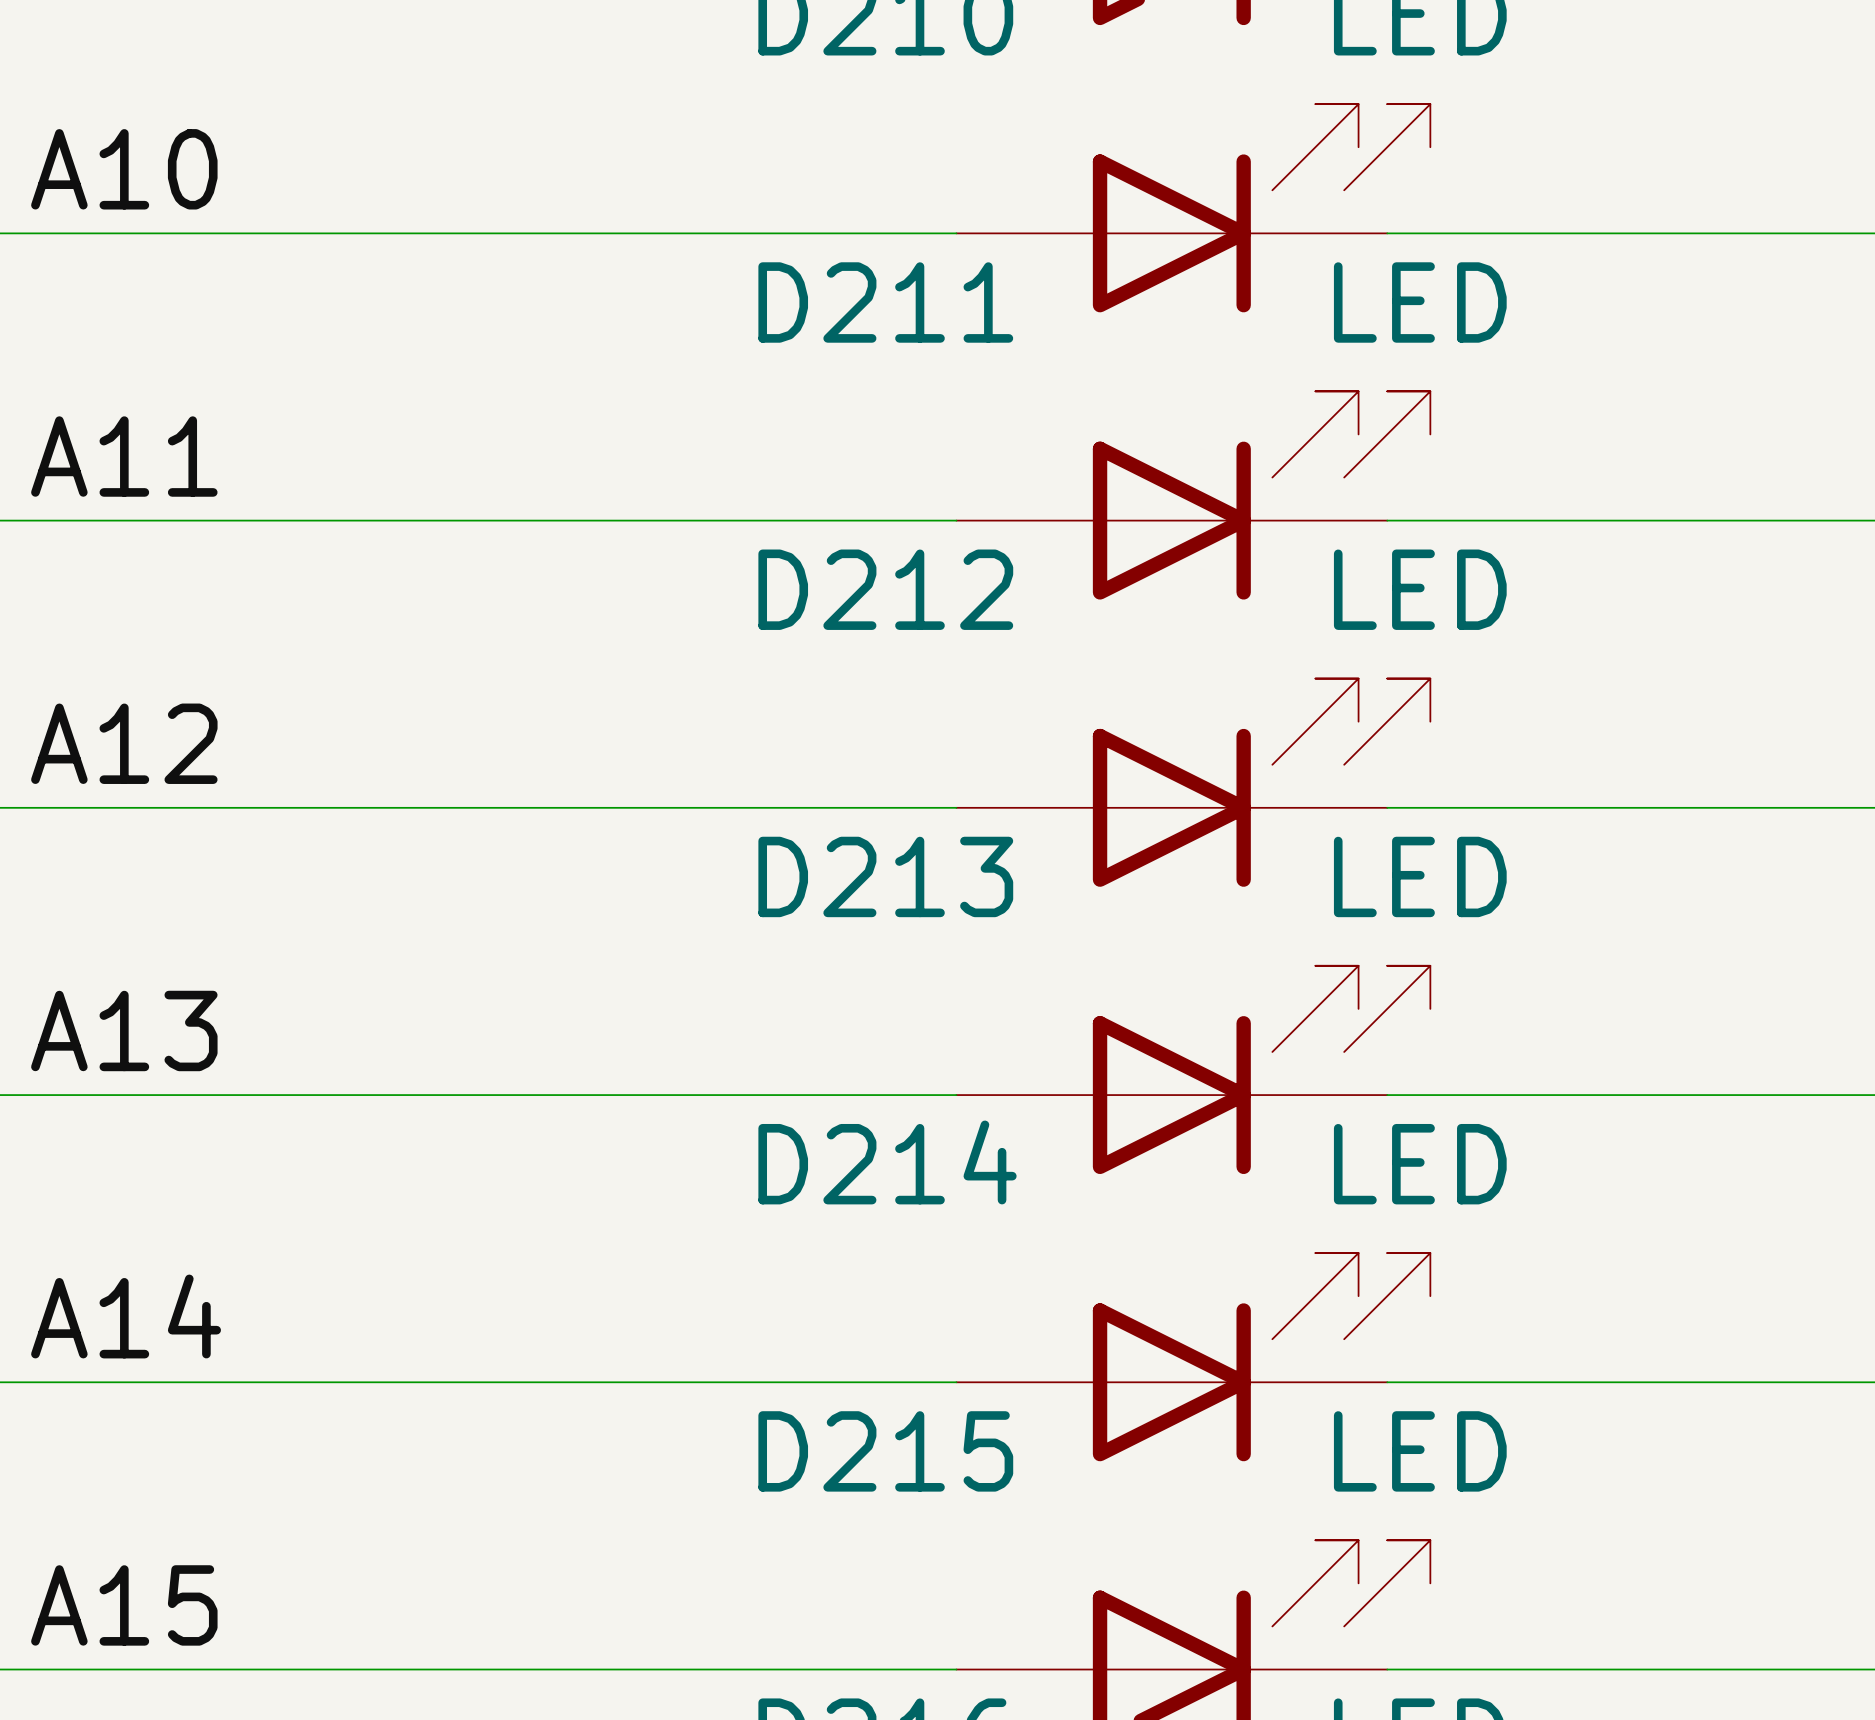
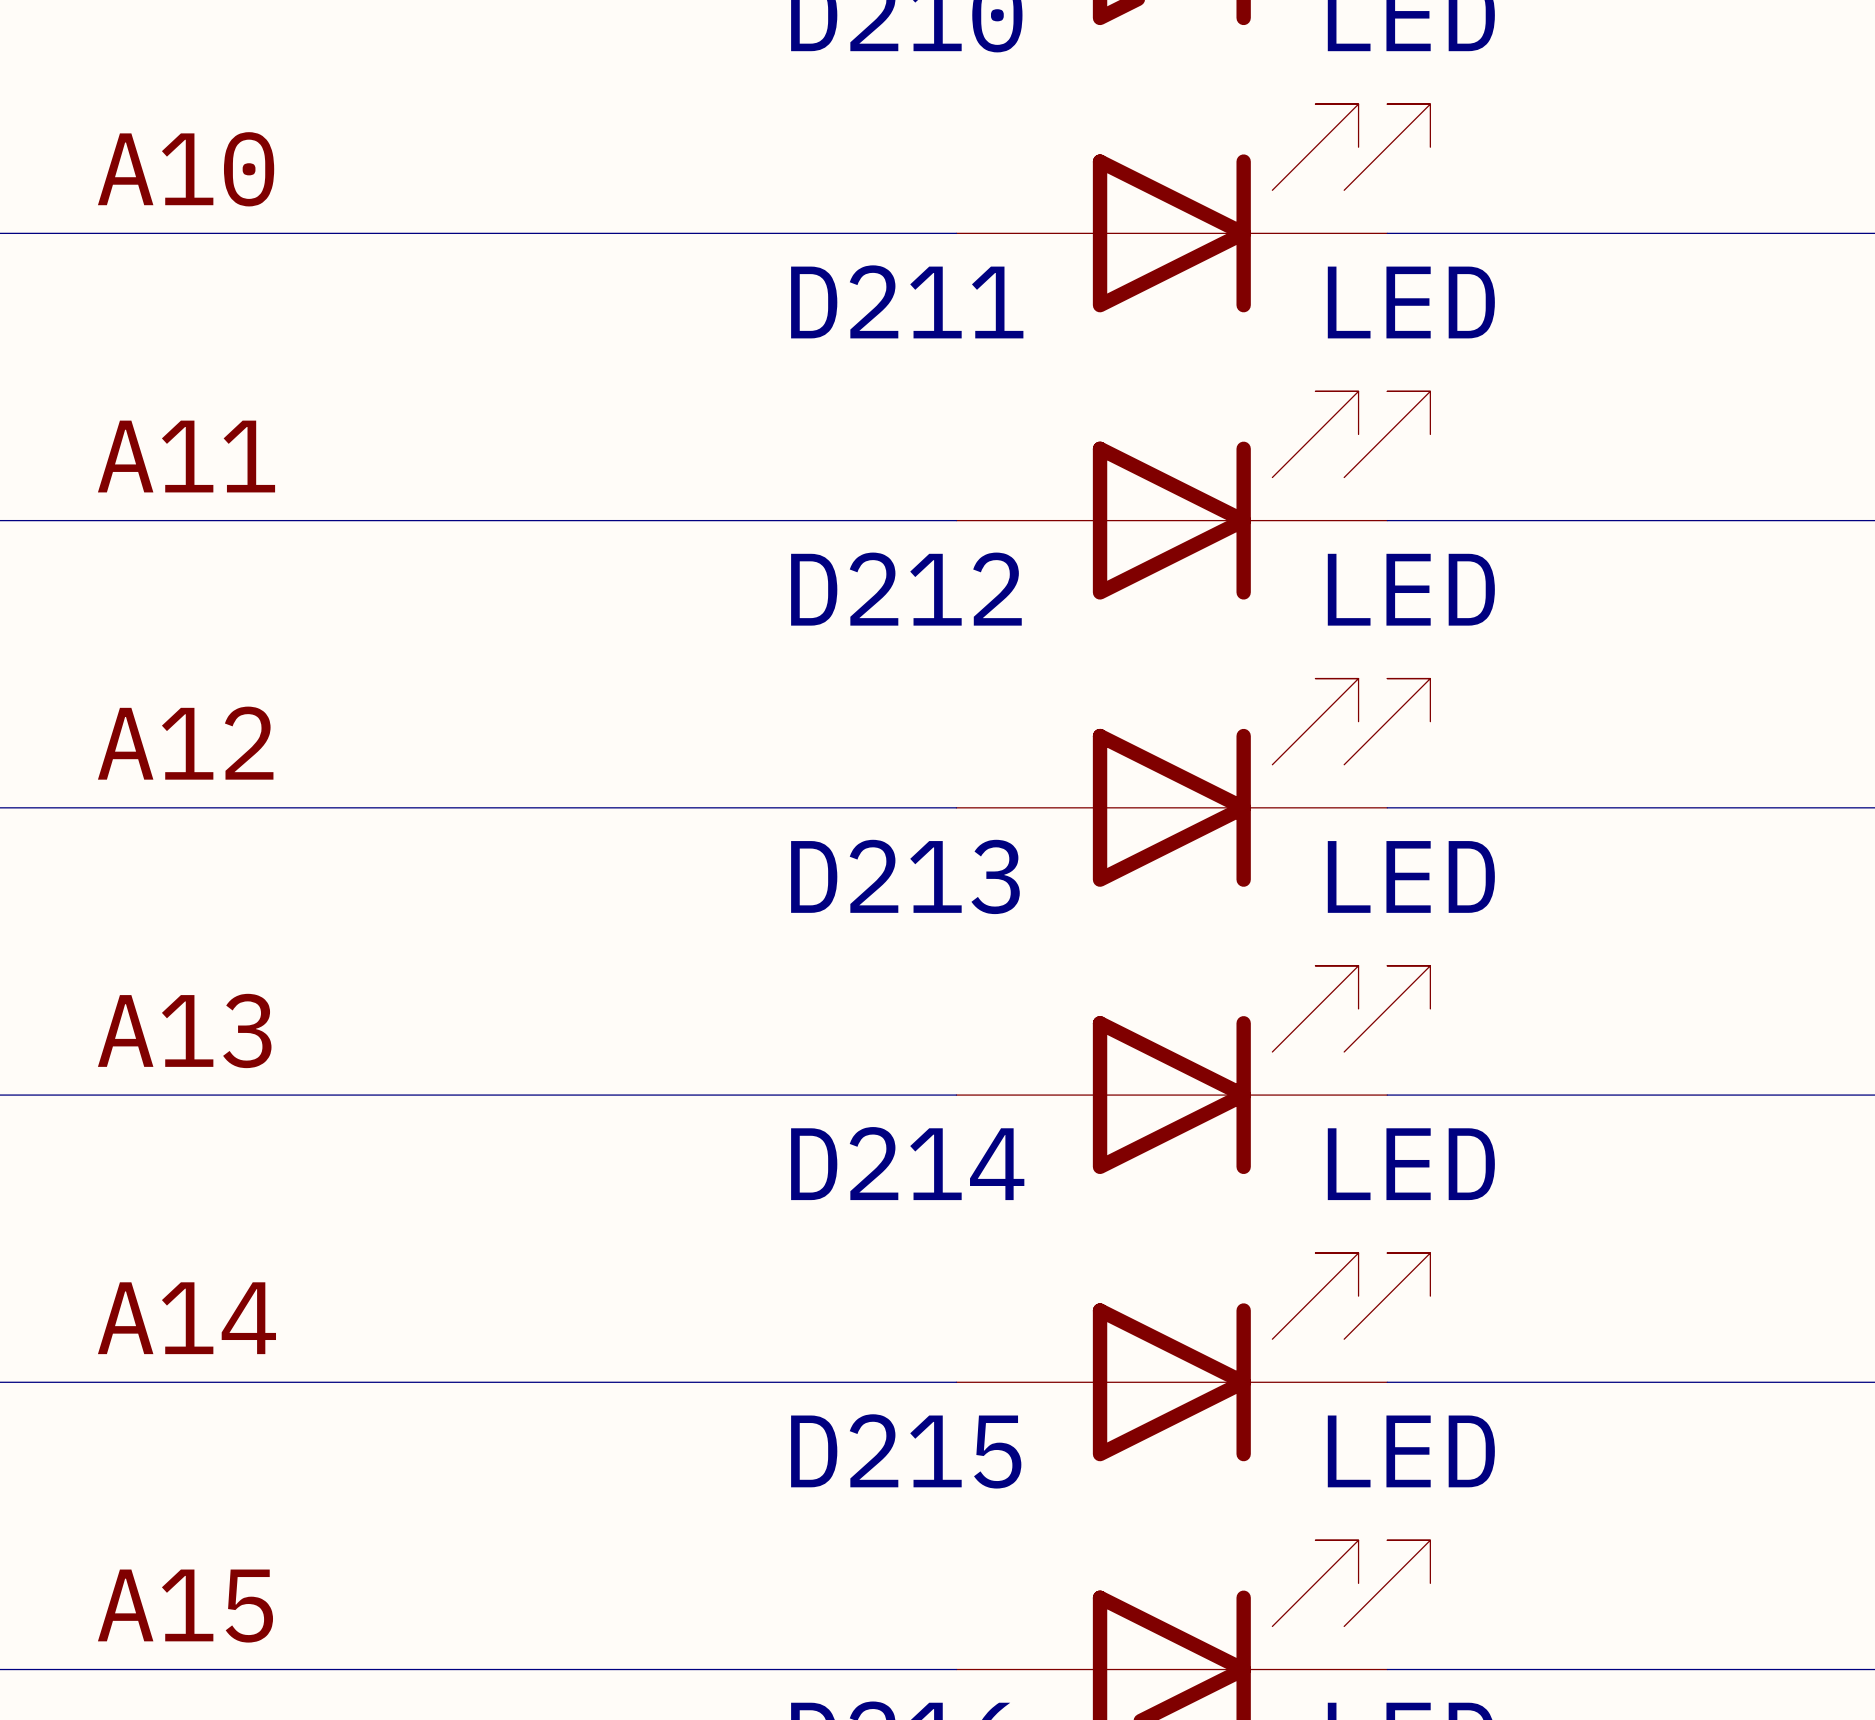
label position: A10 (124, 169) -> A10 (186, 169)
label position: A11 (124, 456) -> A11 (186, 456)
label position: A12 (124, 743) -> A12 (185, 743)
label position: A13 (124, 1030) -> A13 (184, 1030)
label position: A14 (126, 1316) -> A14 (186, 1318)
label position: A15 (124, 1605) -> A15 (185, 1606)

